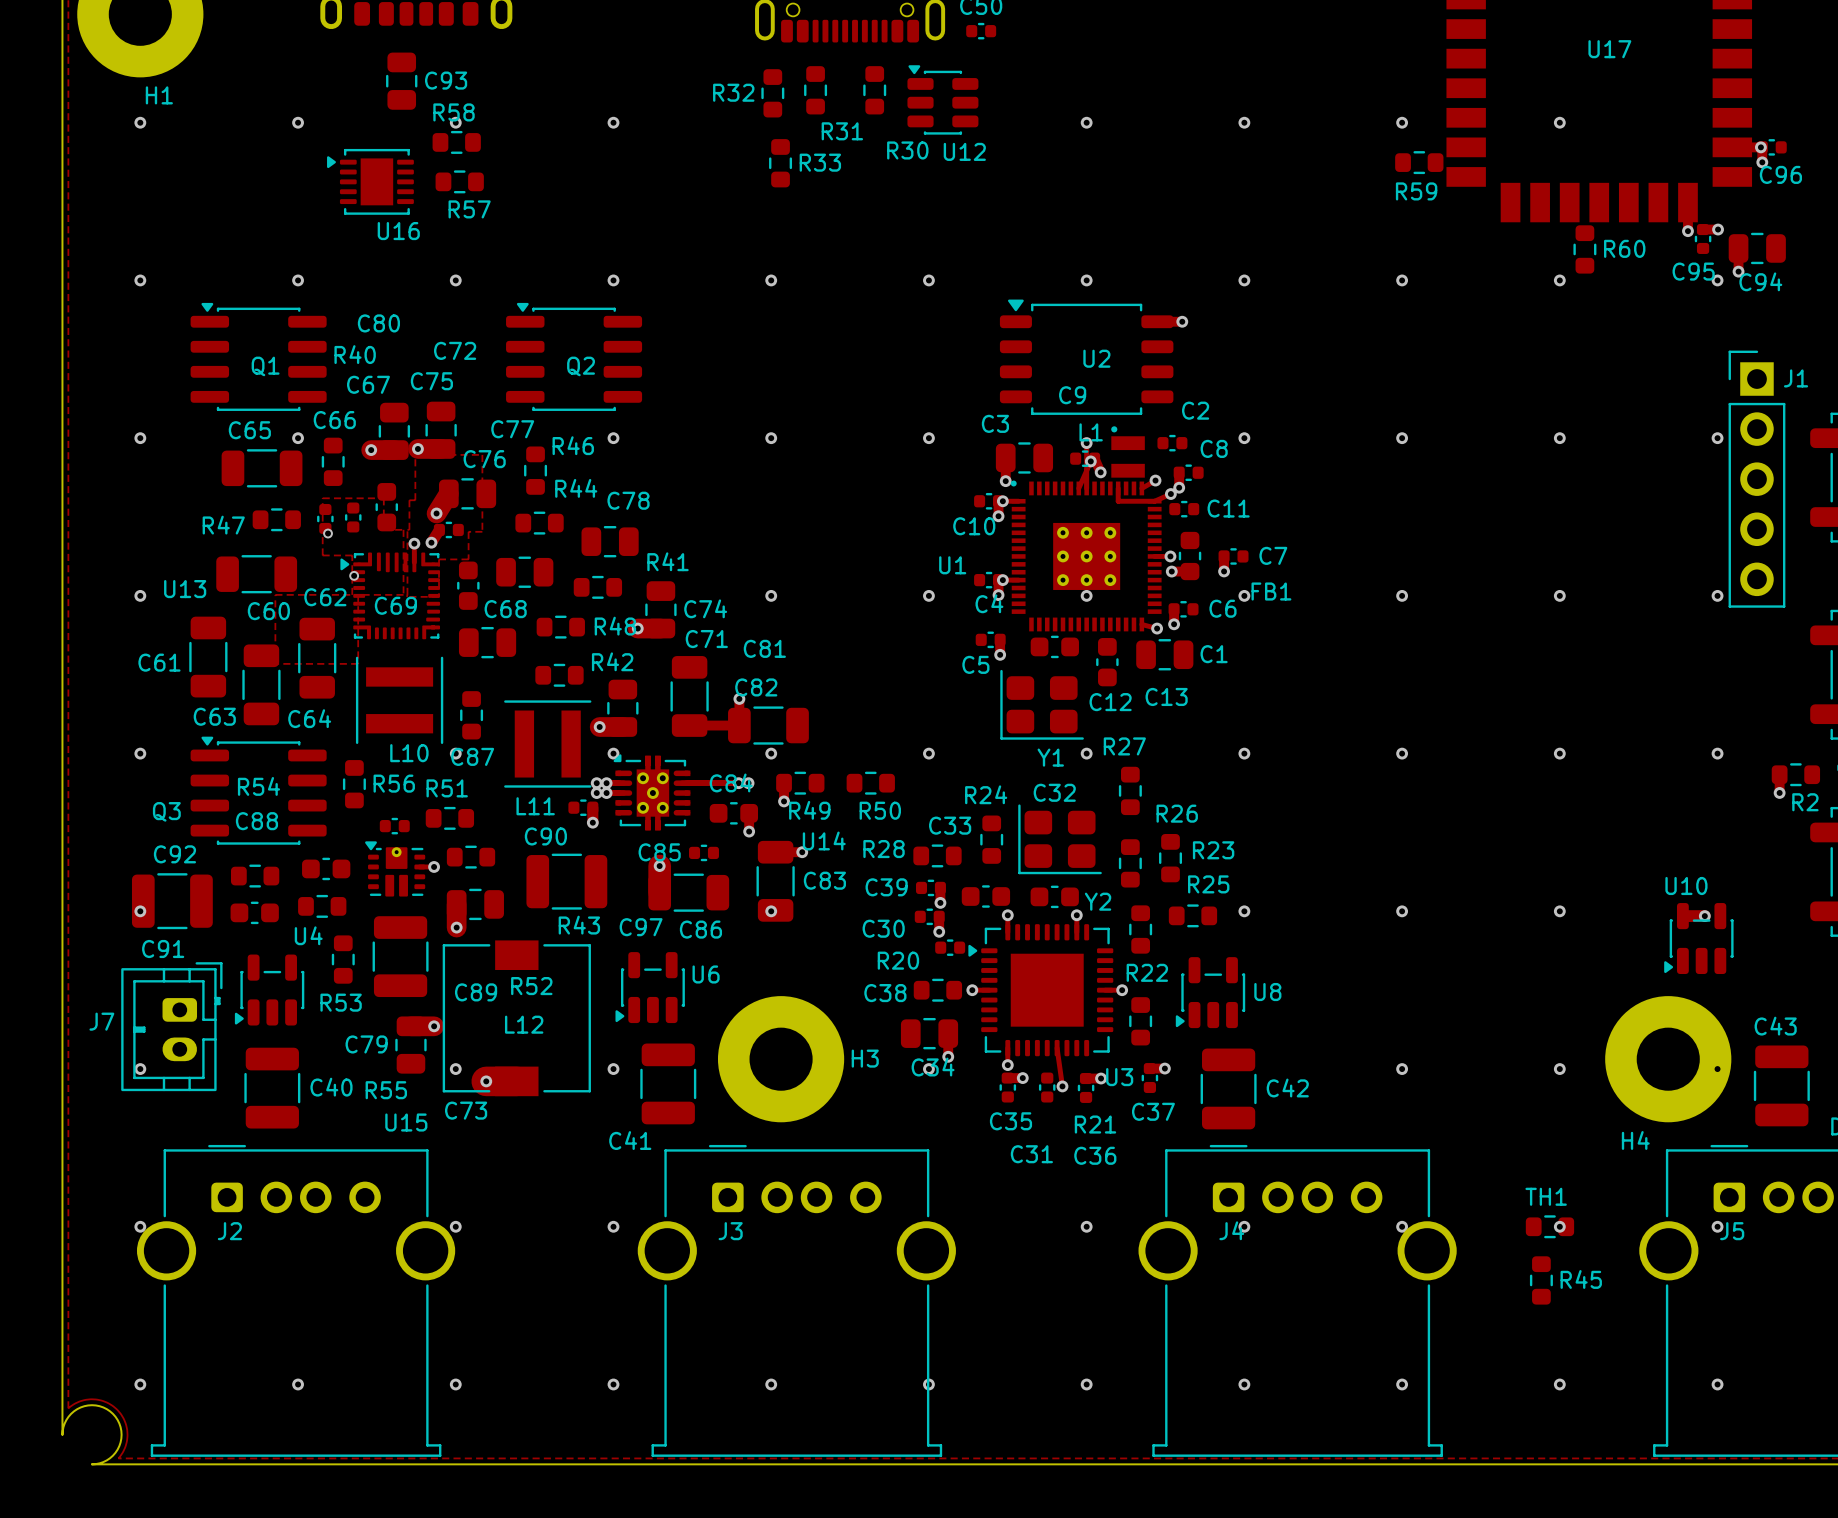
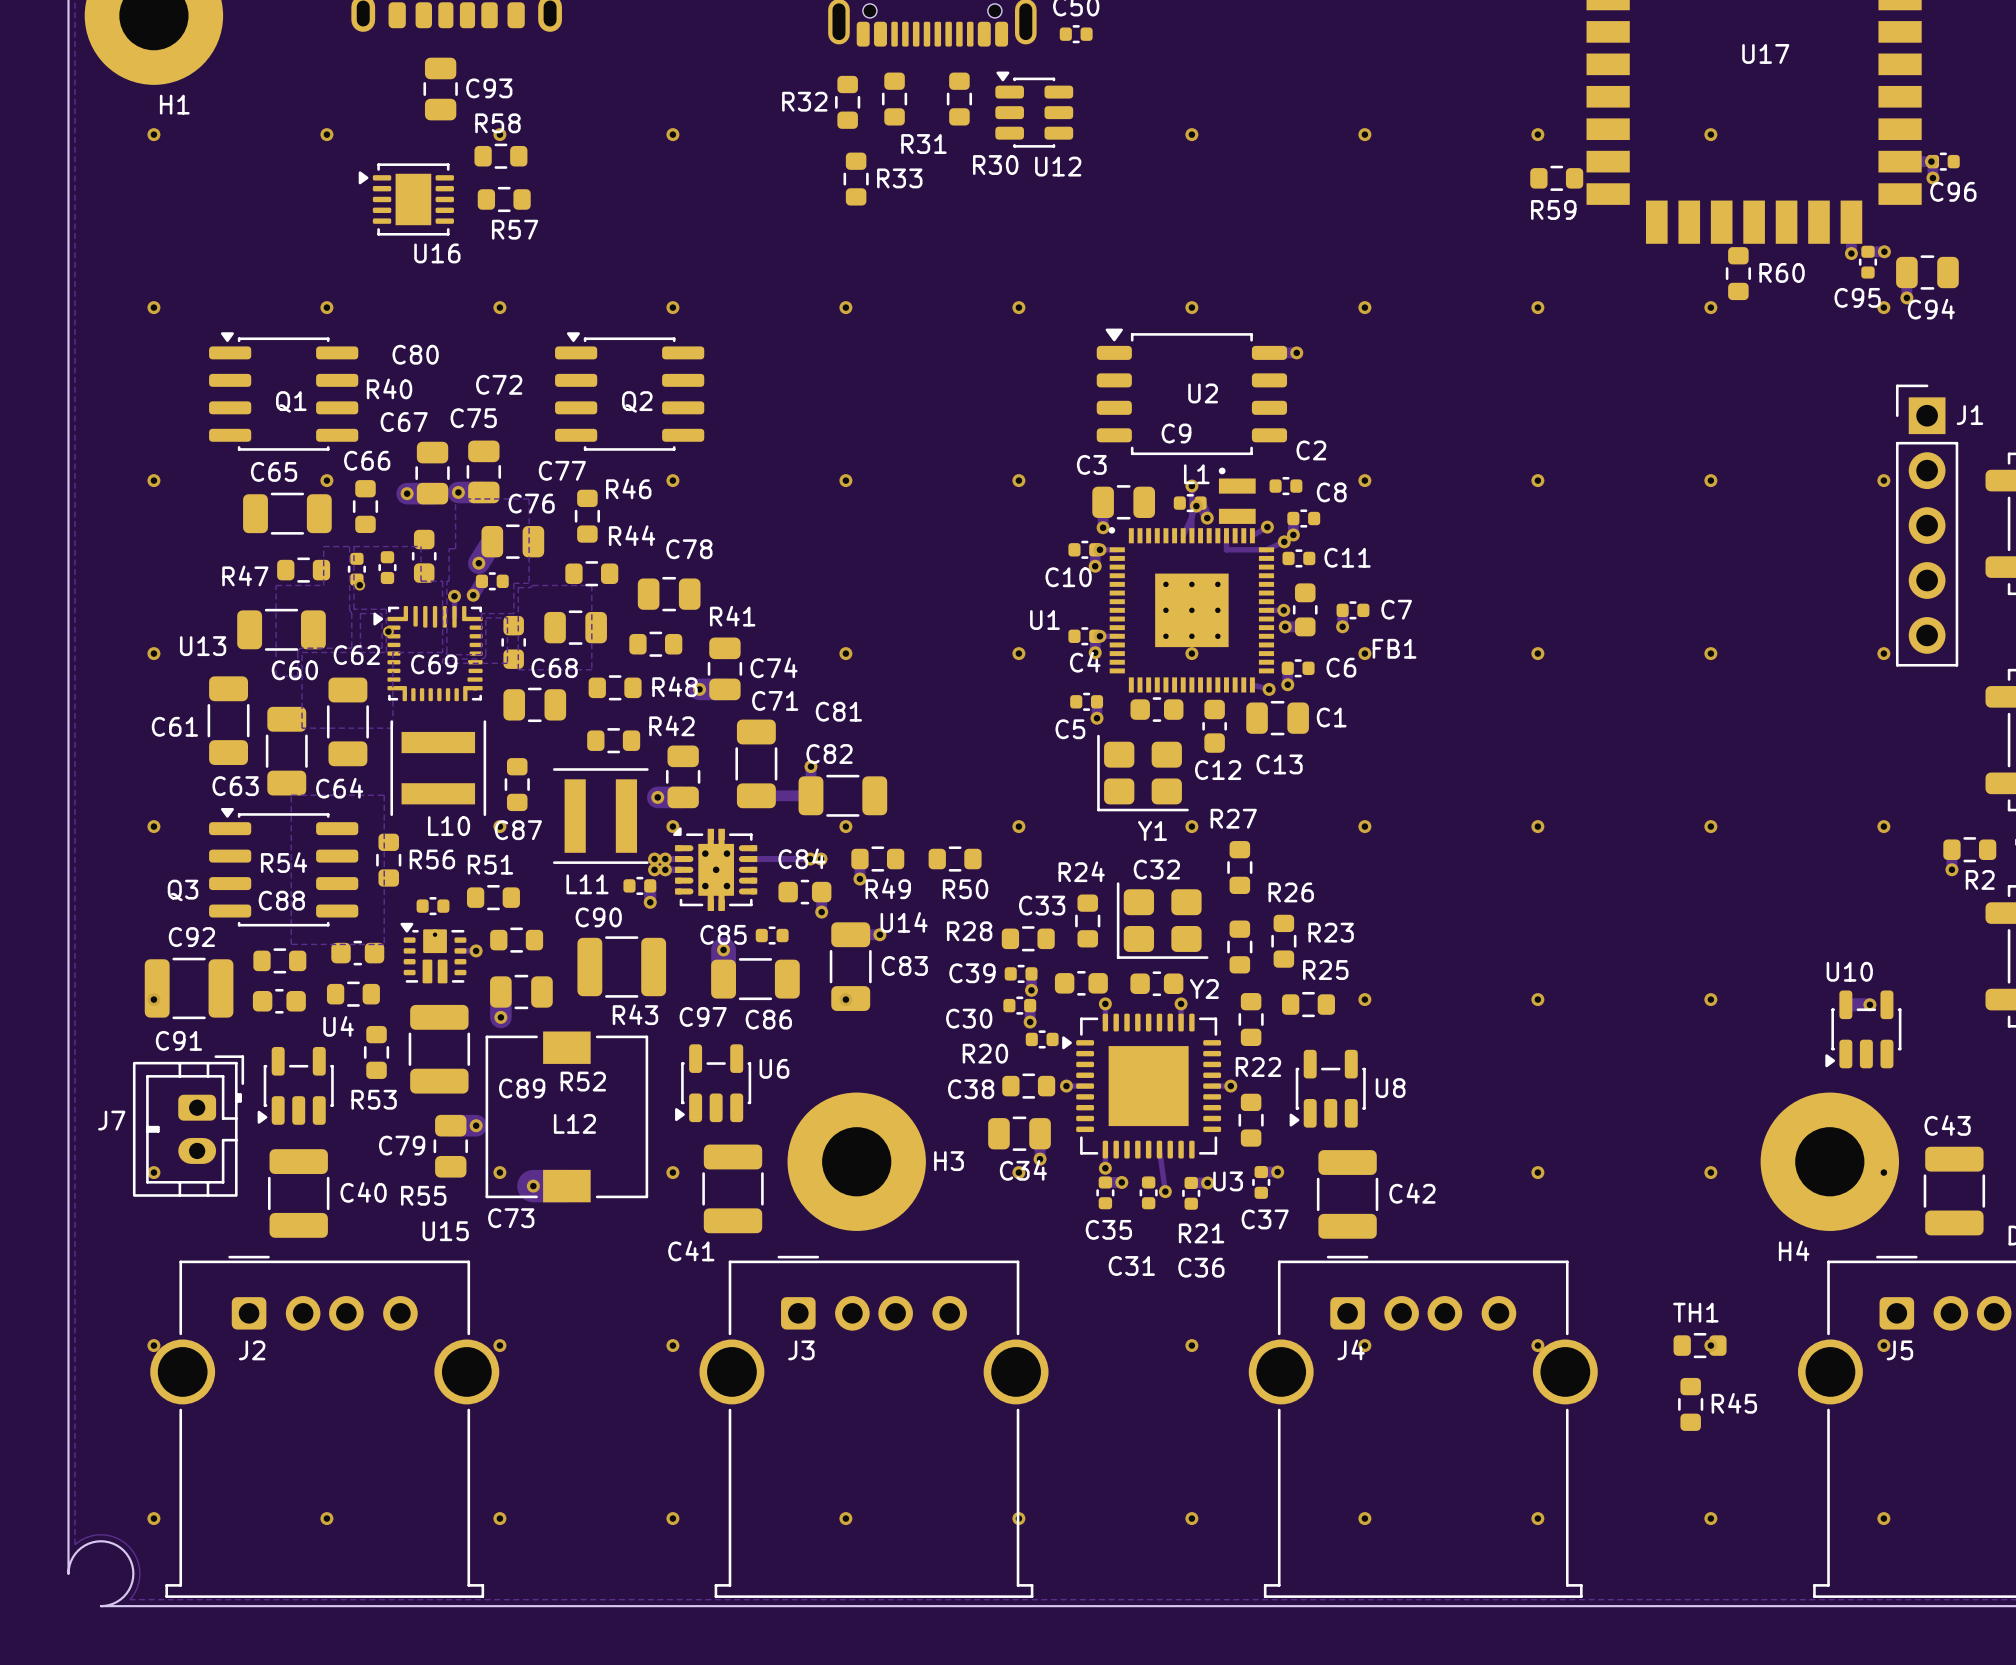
zone outline: none -> (532, 585) (591, 585) (591, 669) (518, 669) (518, 587) (532, 585)
zone outline: none -> (351, 612) (349, 609) (349, 546) (323, 546) (323, 585) (276, 585) (276, 676) (297, 676) (297, 652) (300, 648) (351, 648) (351, 612)
zone outline: none -> (360, 613) (360, 648) (382, 648) (382, 613) (360, 613)
zone outline: none -> (485, 617) (485, 657) (481, 658) (442, 658) (442, 663) (507, 663) (507, 617) (485, 617)
zone outline: none -> (291, 795) (291, 944) (384, 944) (384, 795) (291, 795)

